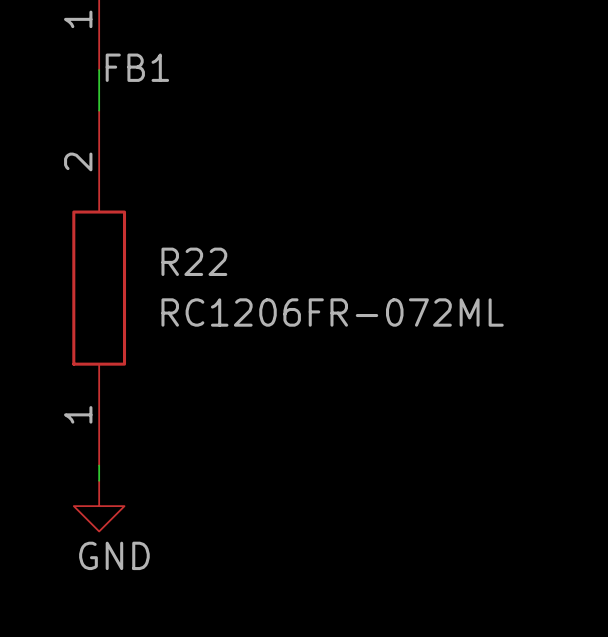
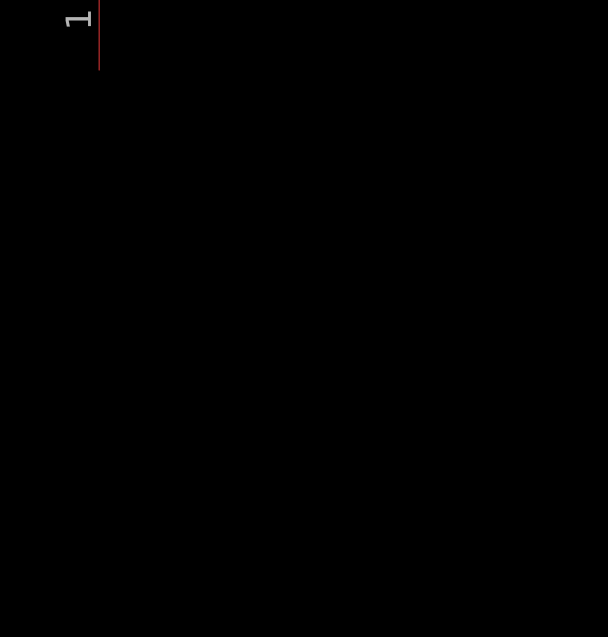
label: FB1 (137, 67) -> none
wire: (99, 70) (99, 110) -> none
R22: RC1206FR-072ML (99, 288) -> none
wire: (99, 465) (99, 480) -> none
power symbol: GND (99, 506) -> none

